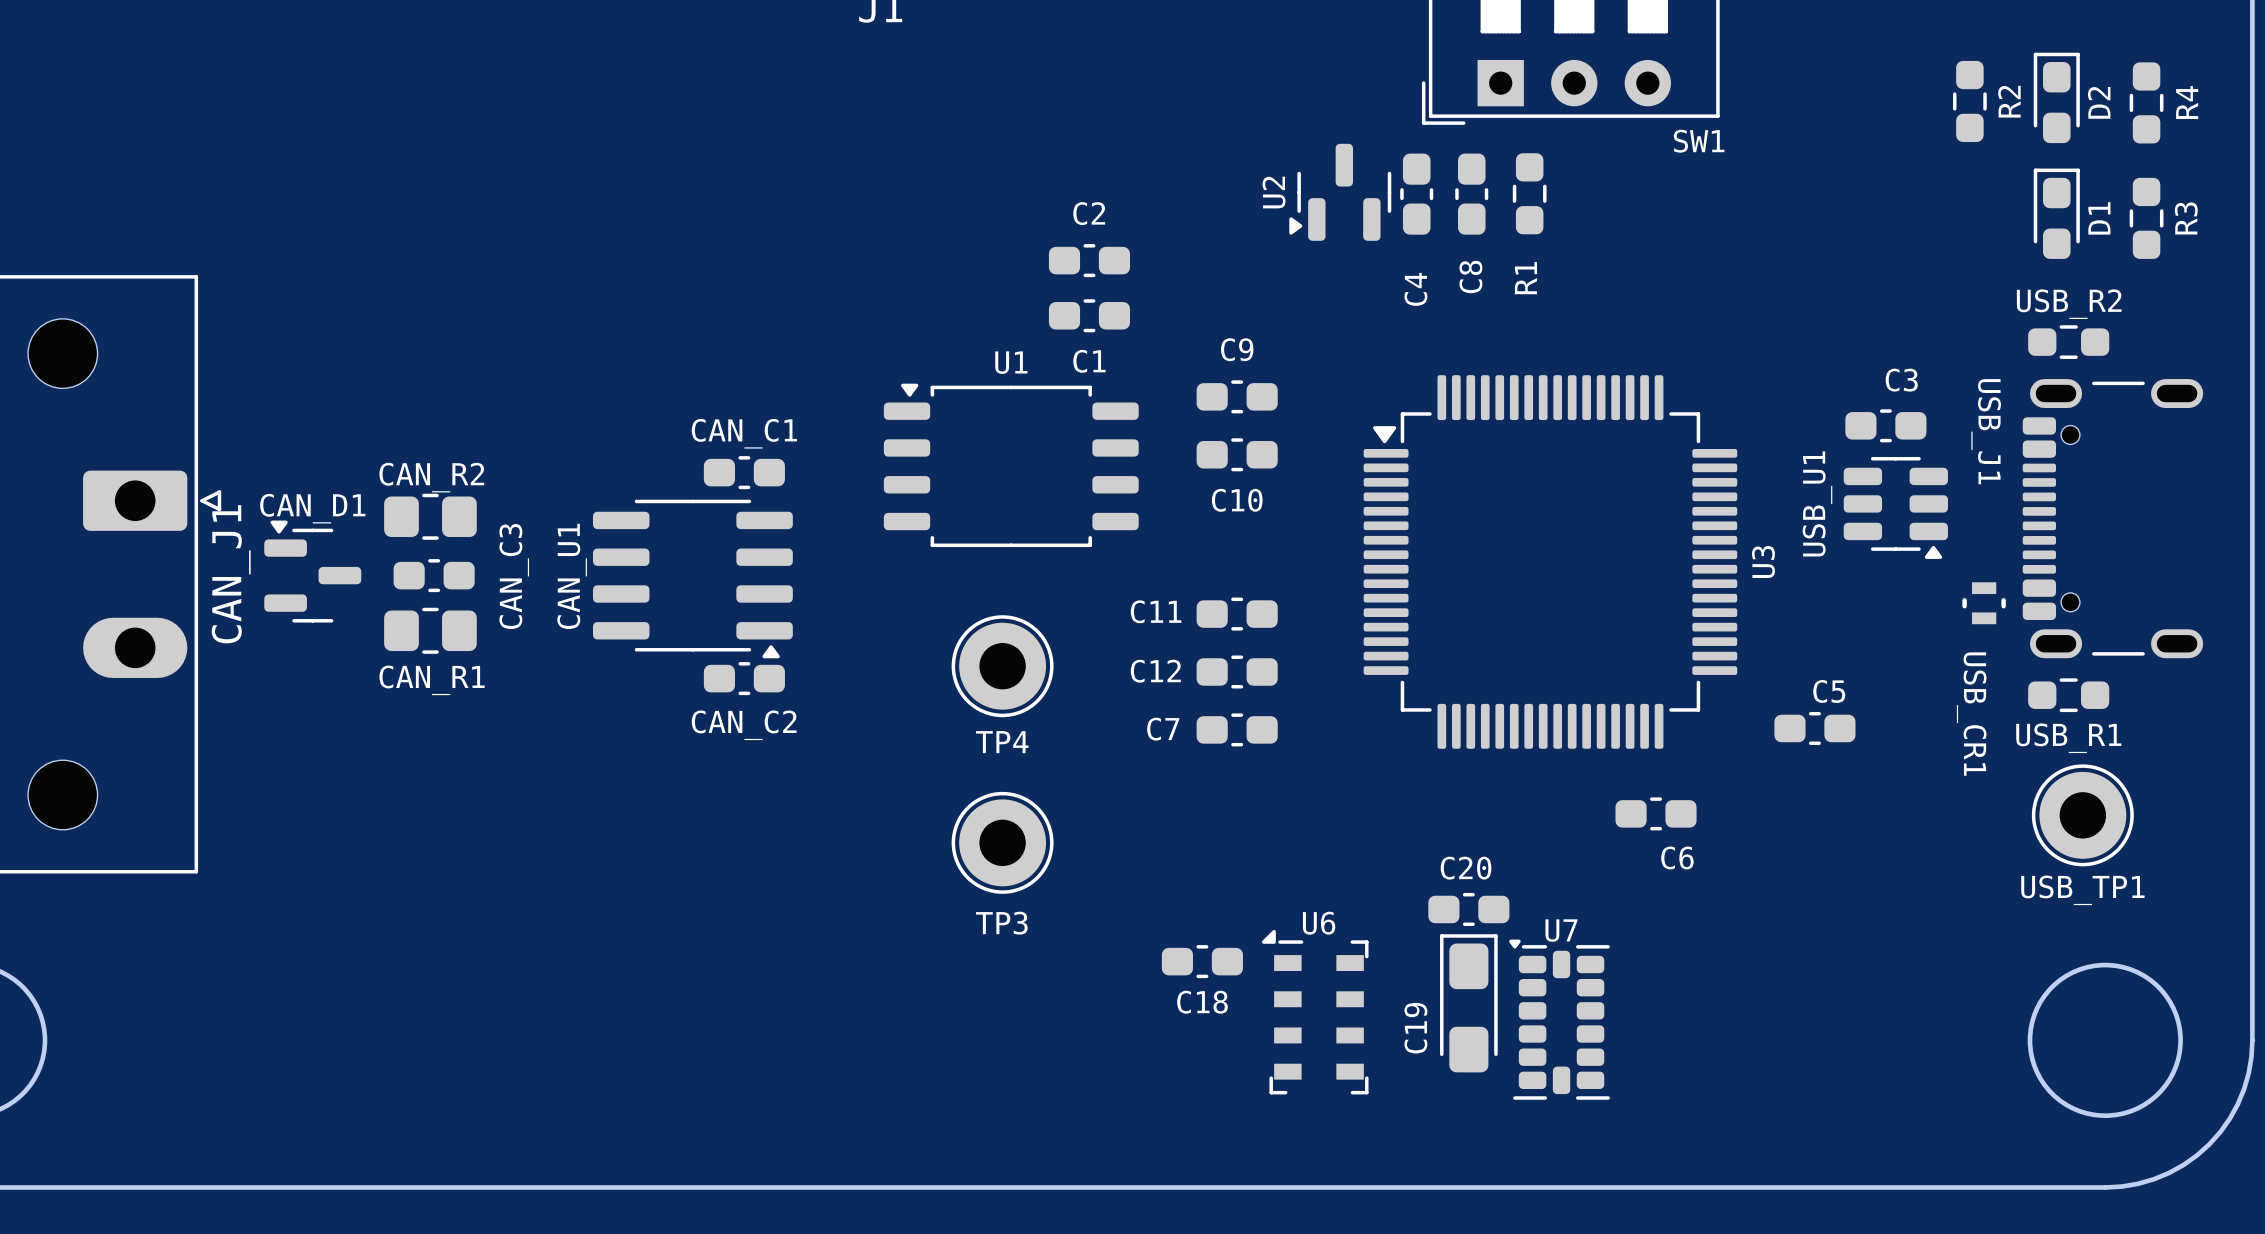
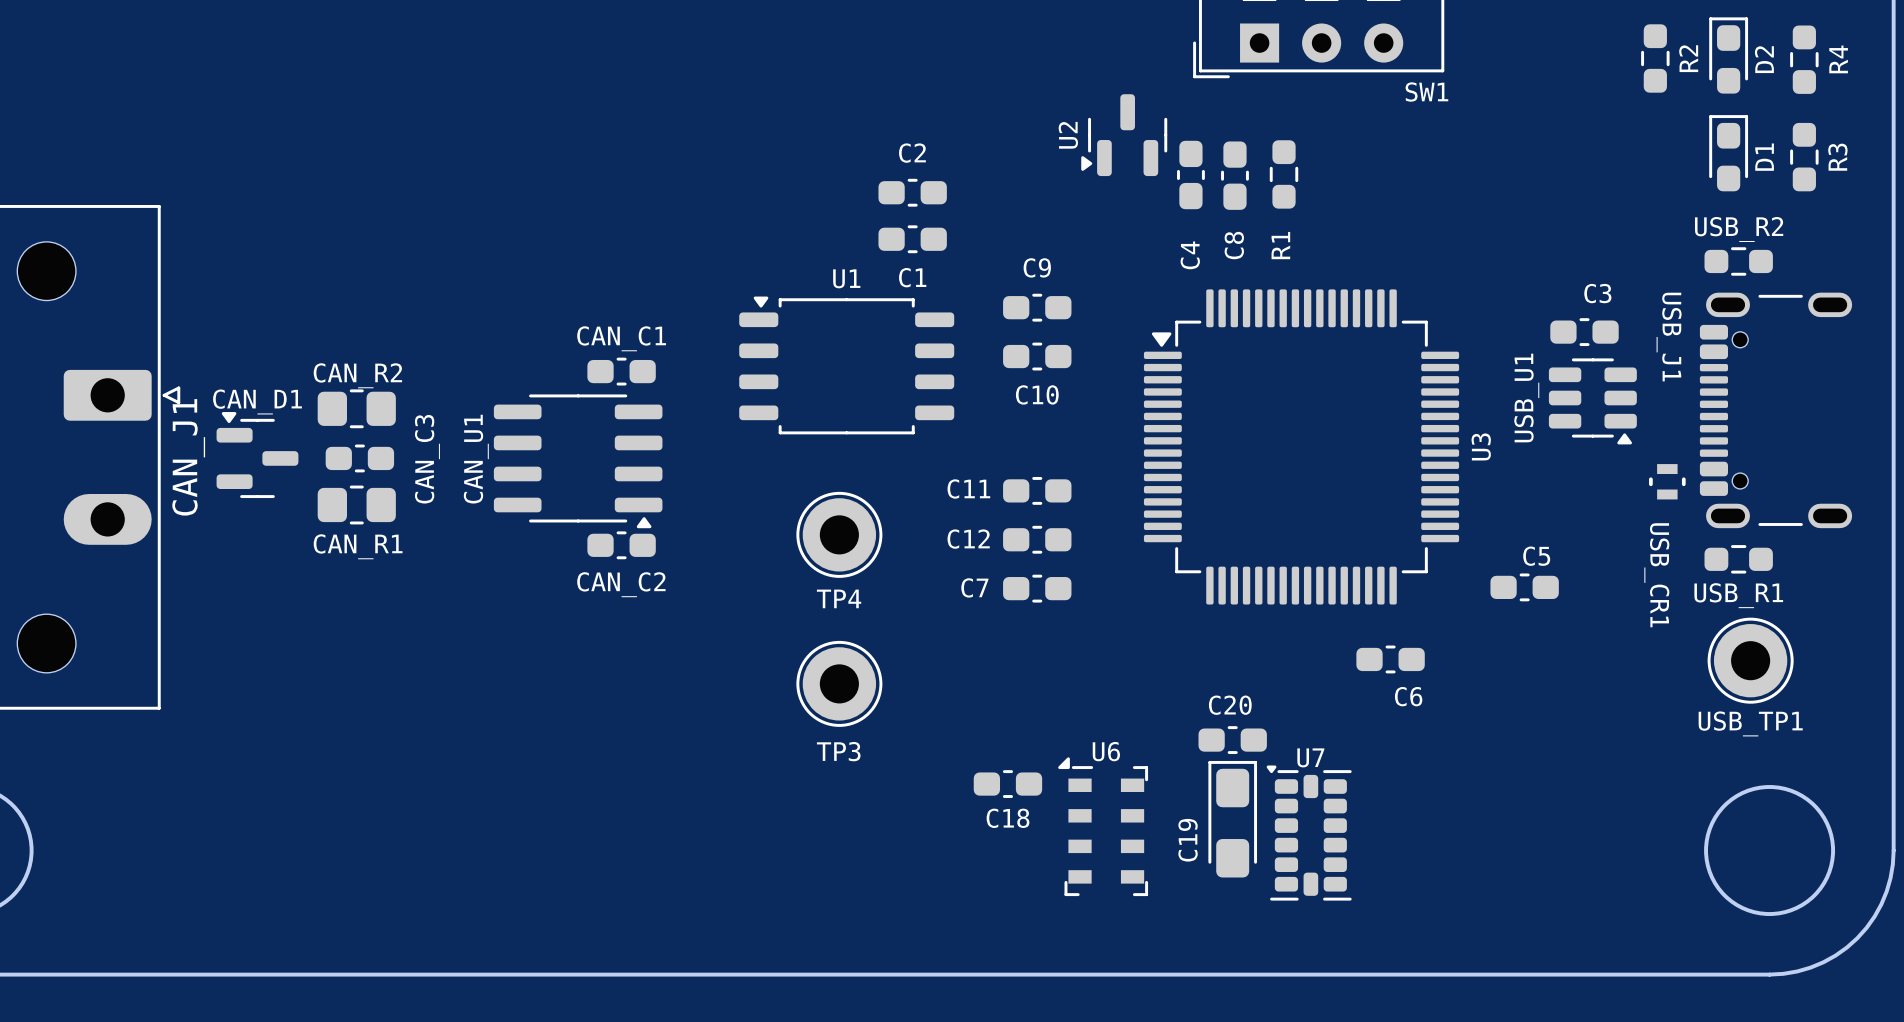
R1 position: (1529, 193) -> (1284, 174)
C4 position: (1416, 194) -> (1190, 174)
C8 position: (1471, 194) -> (1234, 175)

